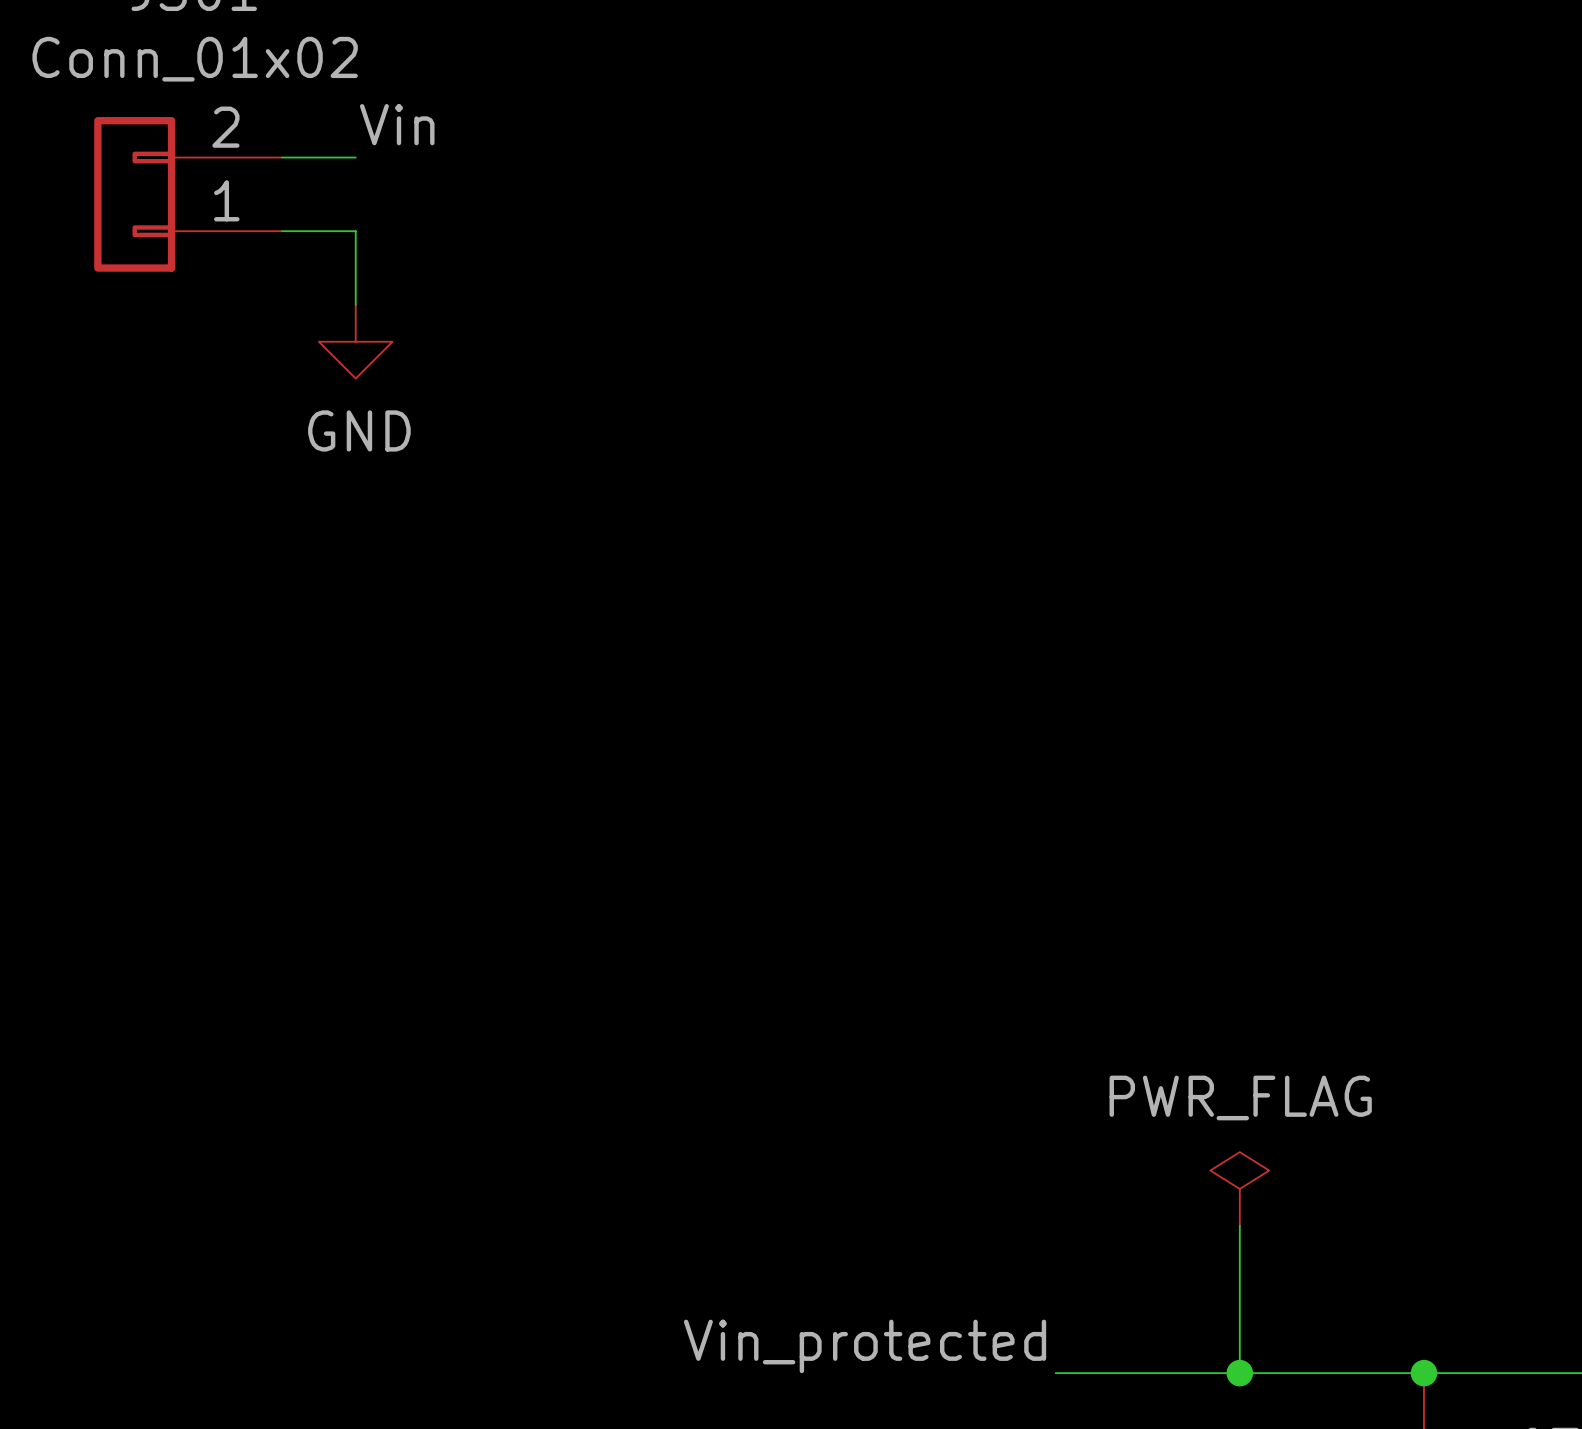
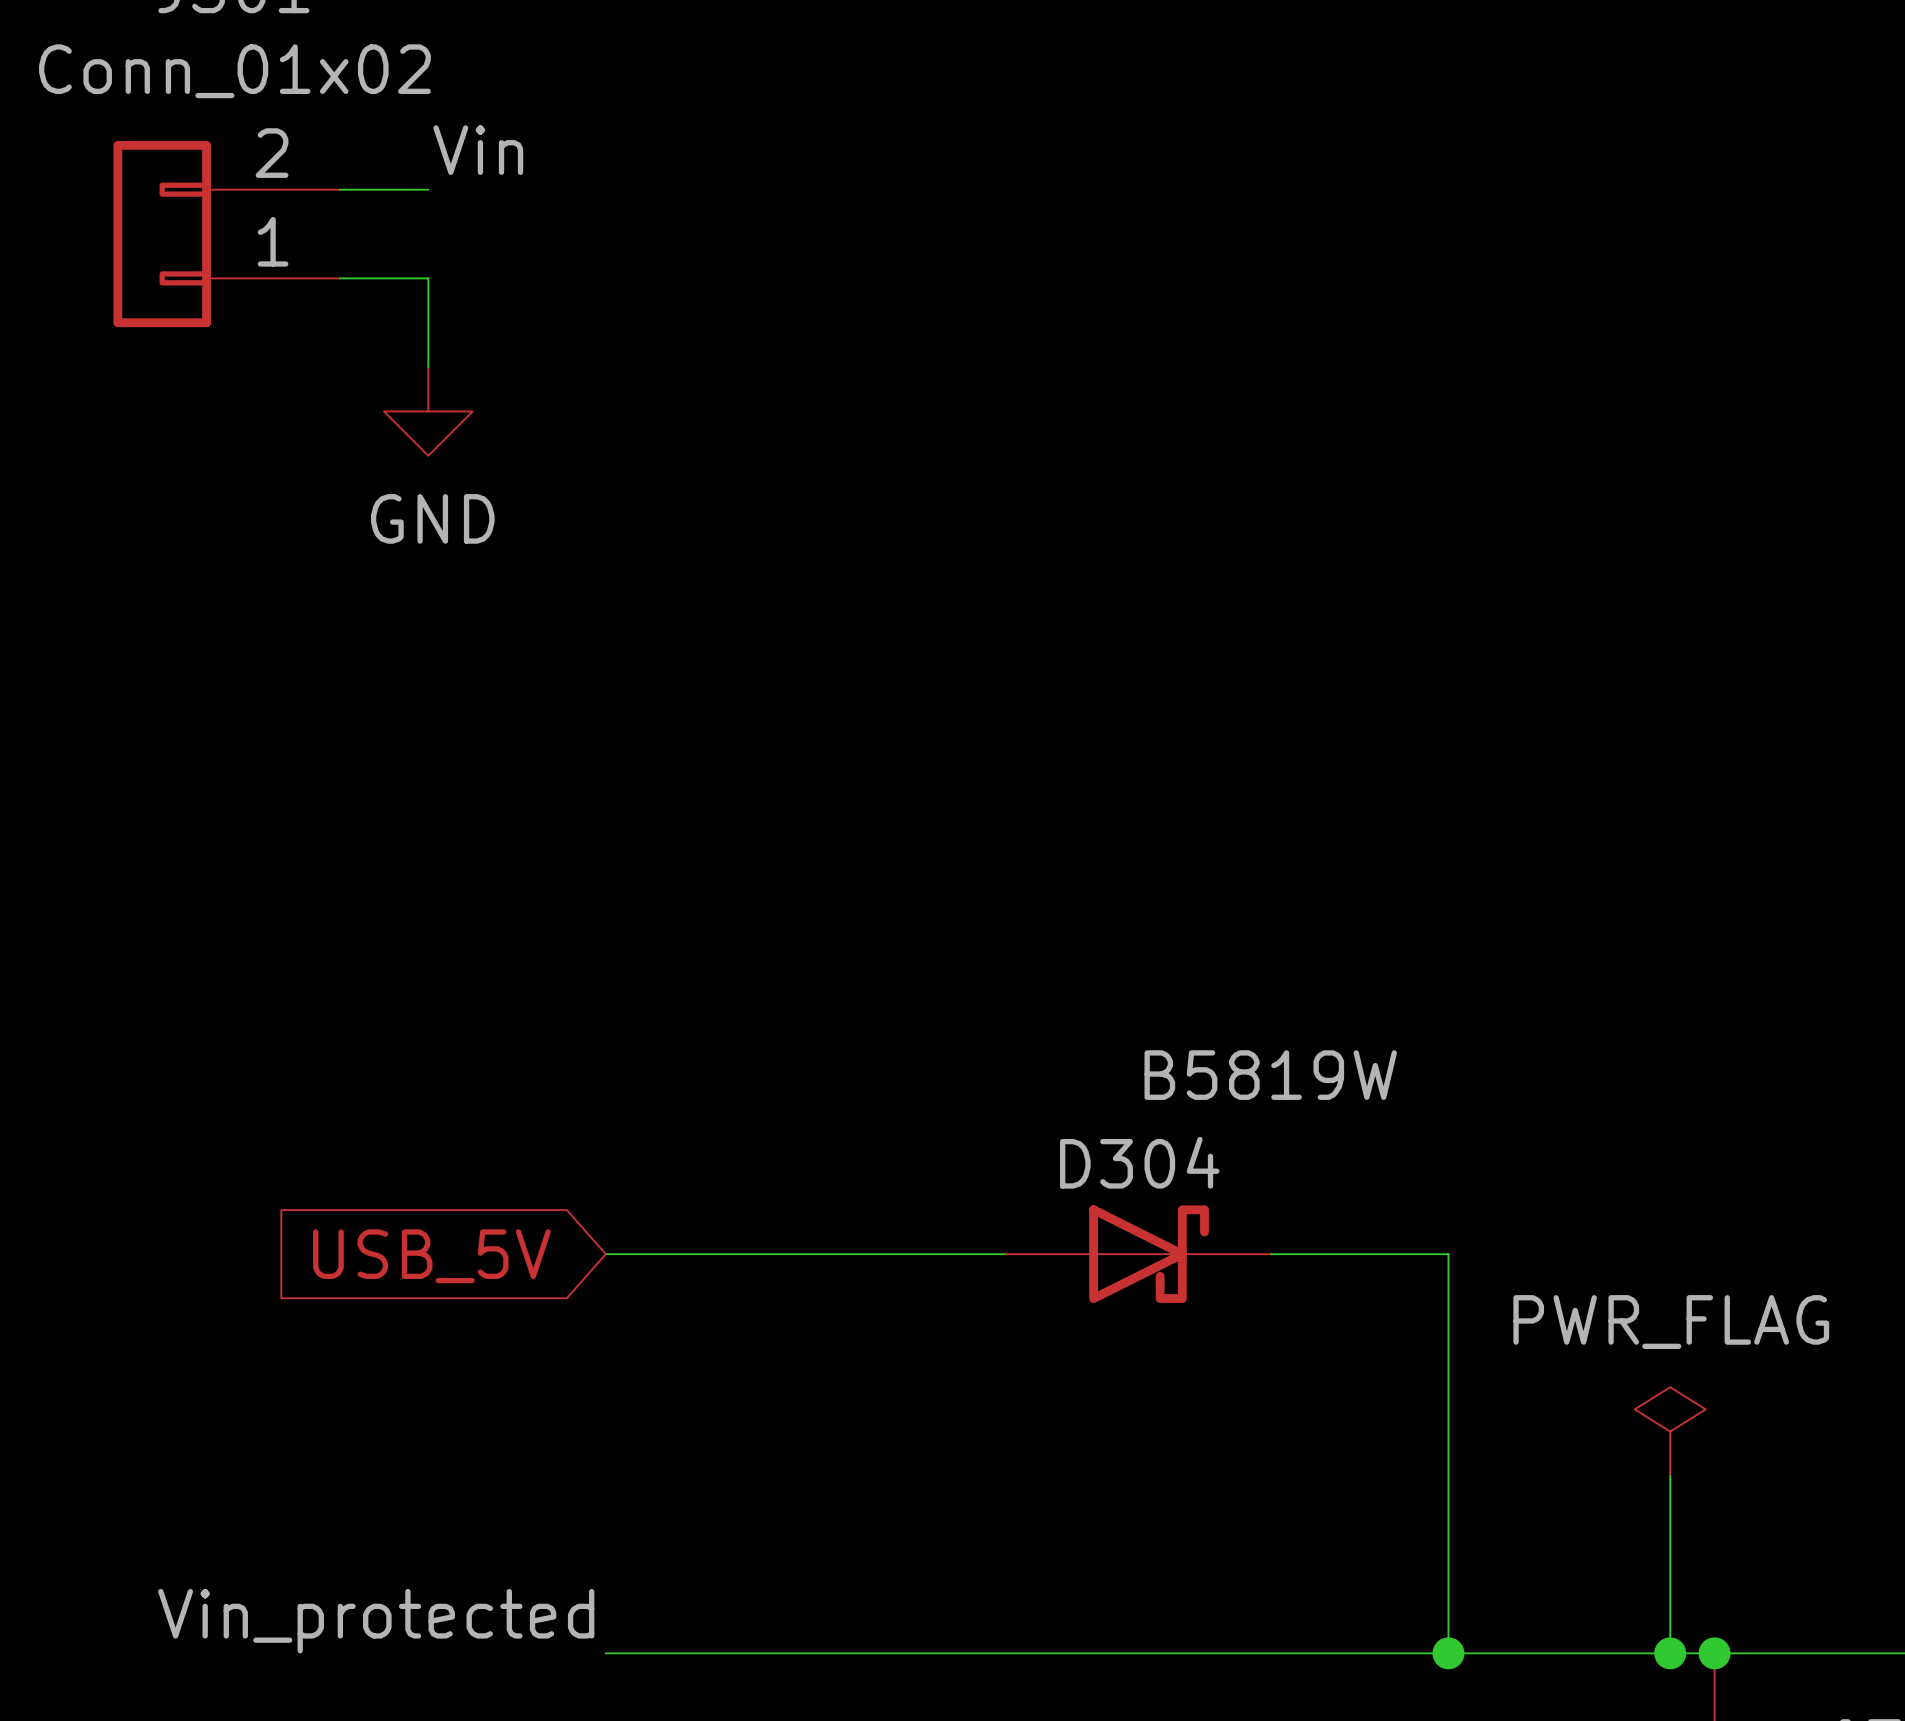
wire: none -> (605, 1254) (1004, 1254)
D304: none -> B5819W (1137, 1254)
wire: none -> (1271, 1254) (1448, 1254) (1448, 1653)
global label: none -> USB_5V (431, 1256)
power symbol position: PWR_FLAG (1239, 1188) -> PWR_FLAG (1670, 1431)
wire: (1239, 1225) (1239, 1373) -> (1670, 1475) (1670, 1653)
label position: Vin_protected (865, 1346) -> Vin_protected (376, 1621)
wire: none -> (605, 1653) (1271, 1653)
junction position: (1239, 1373) -> (1448, 1653)
junction: none -> (1670, 1653)

